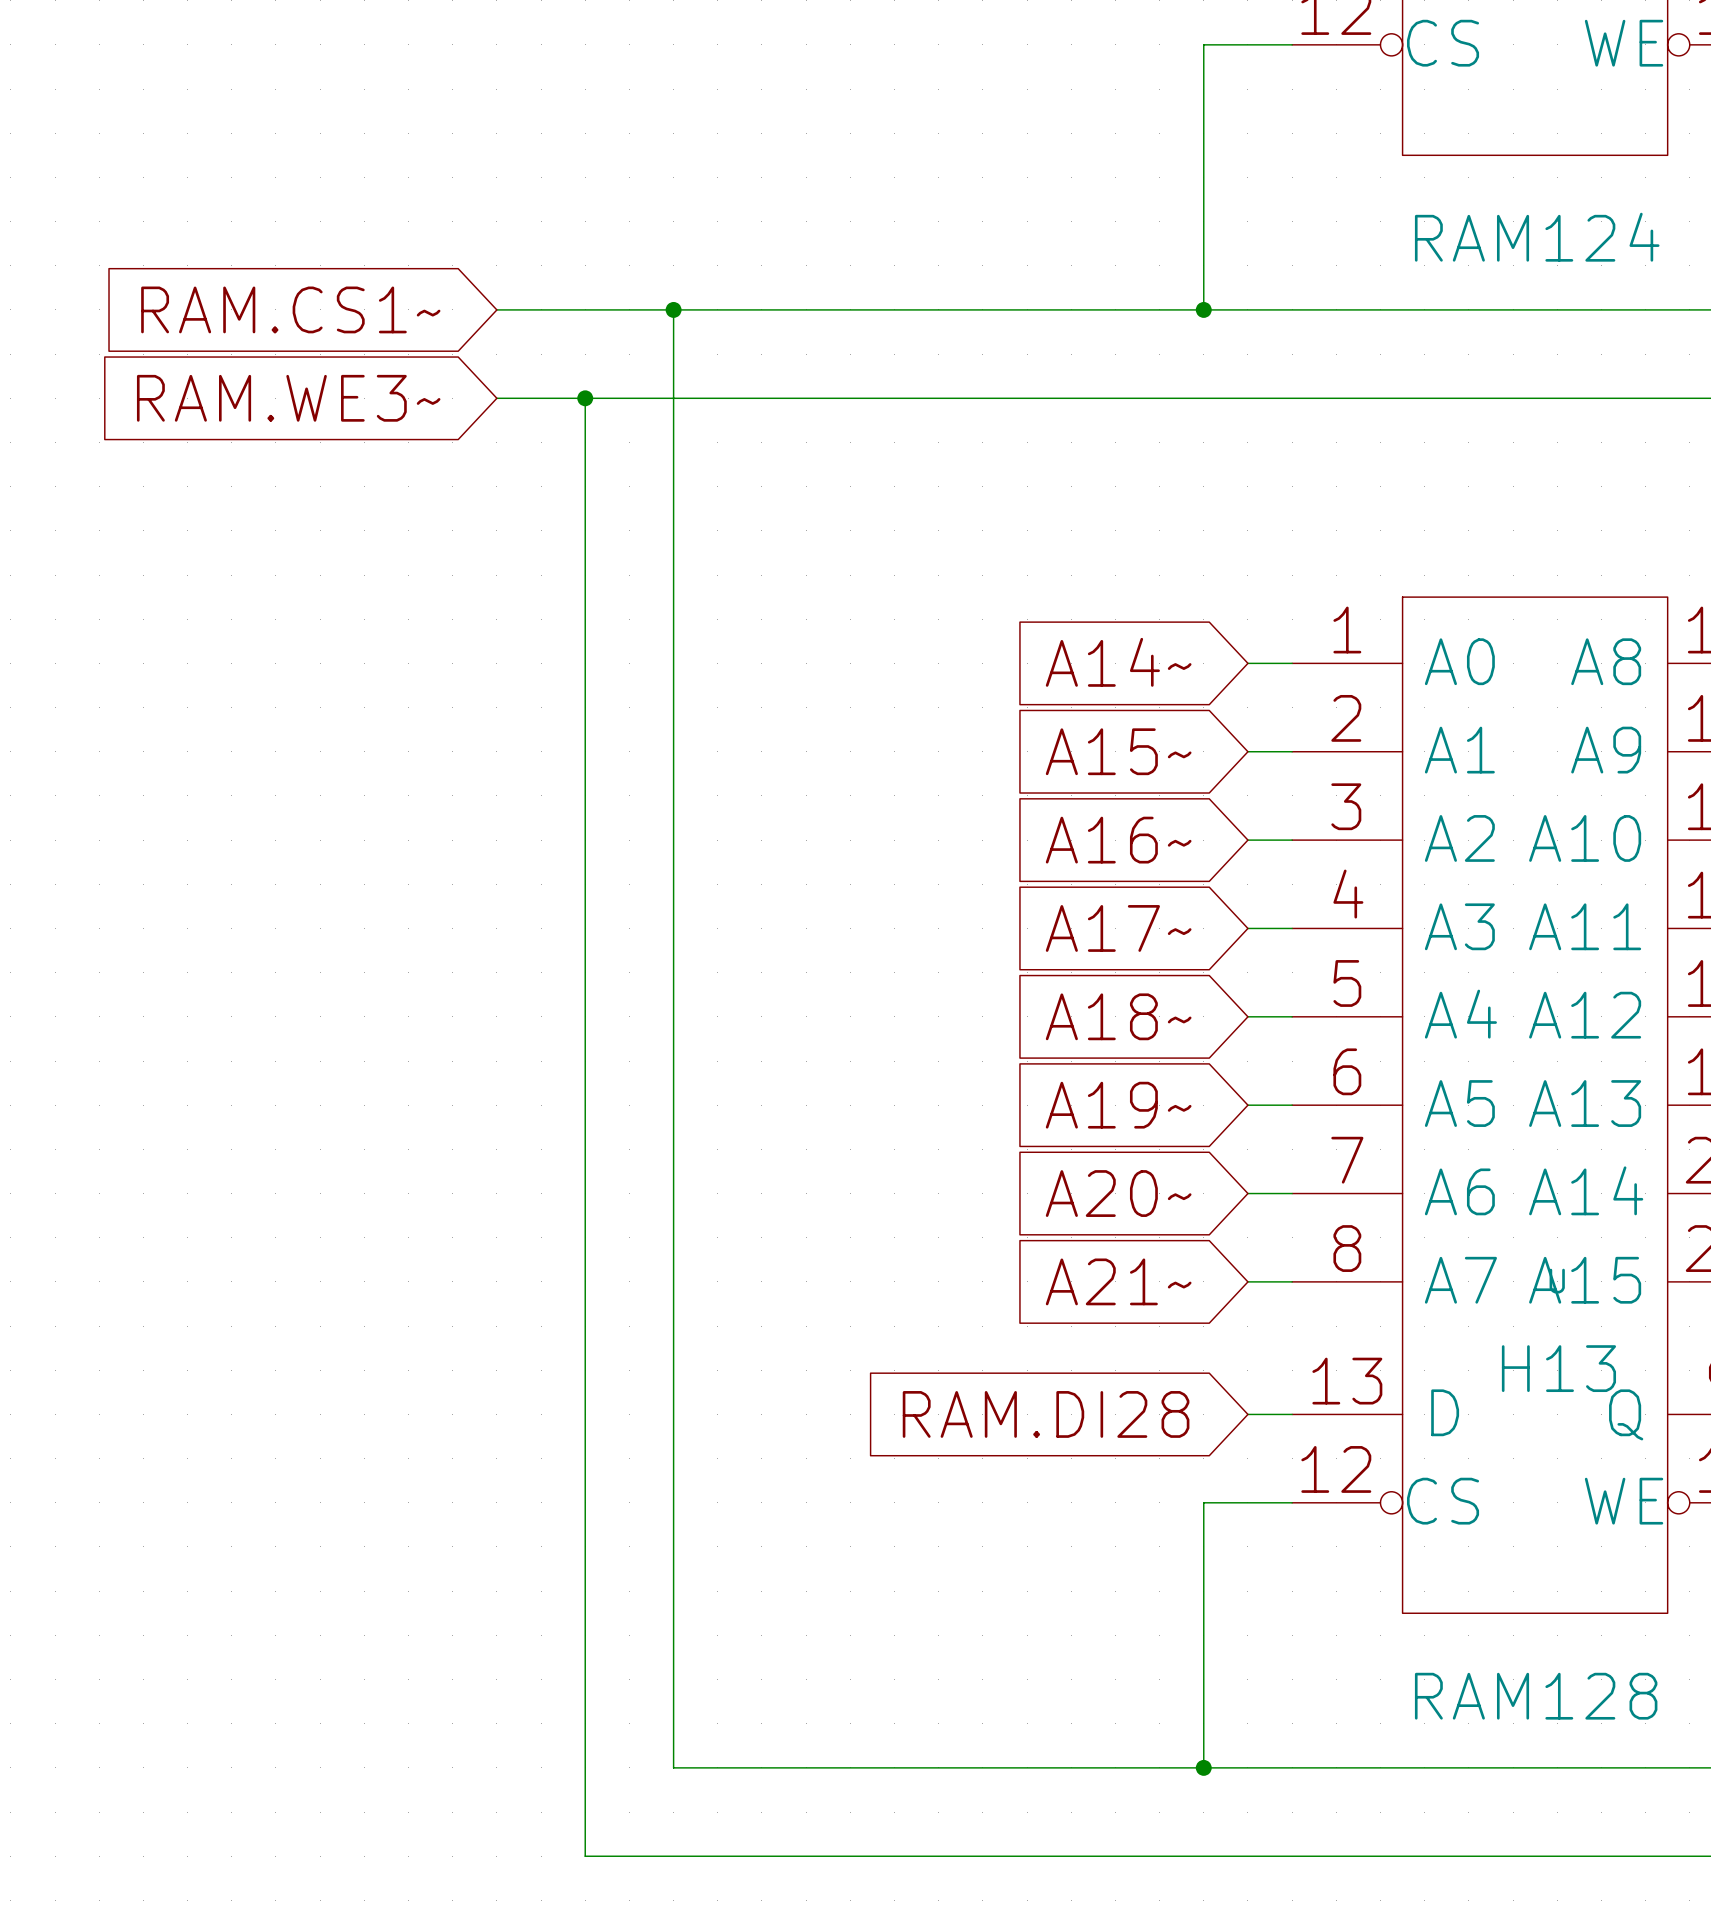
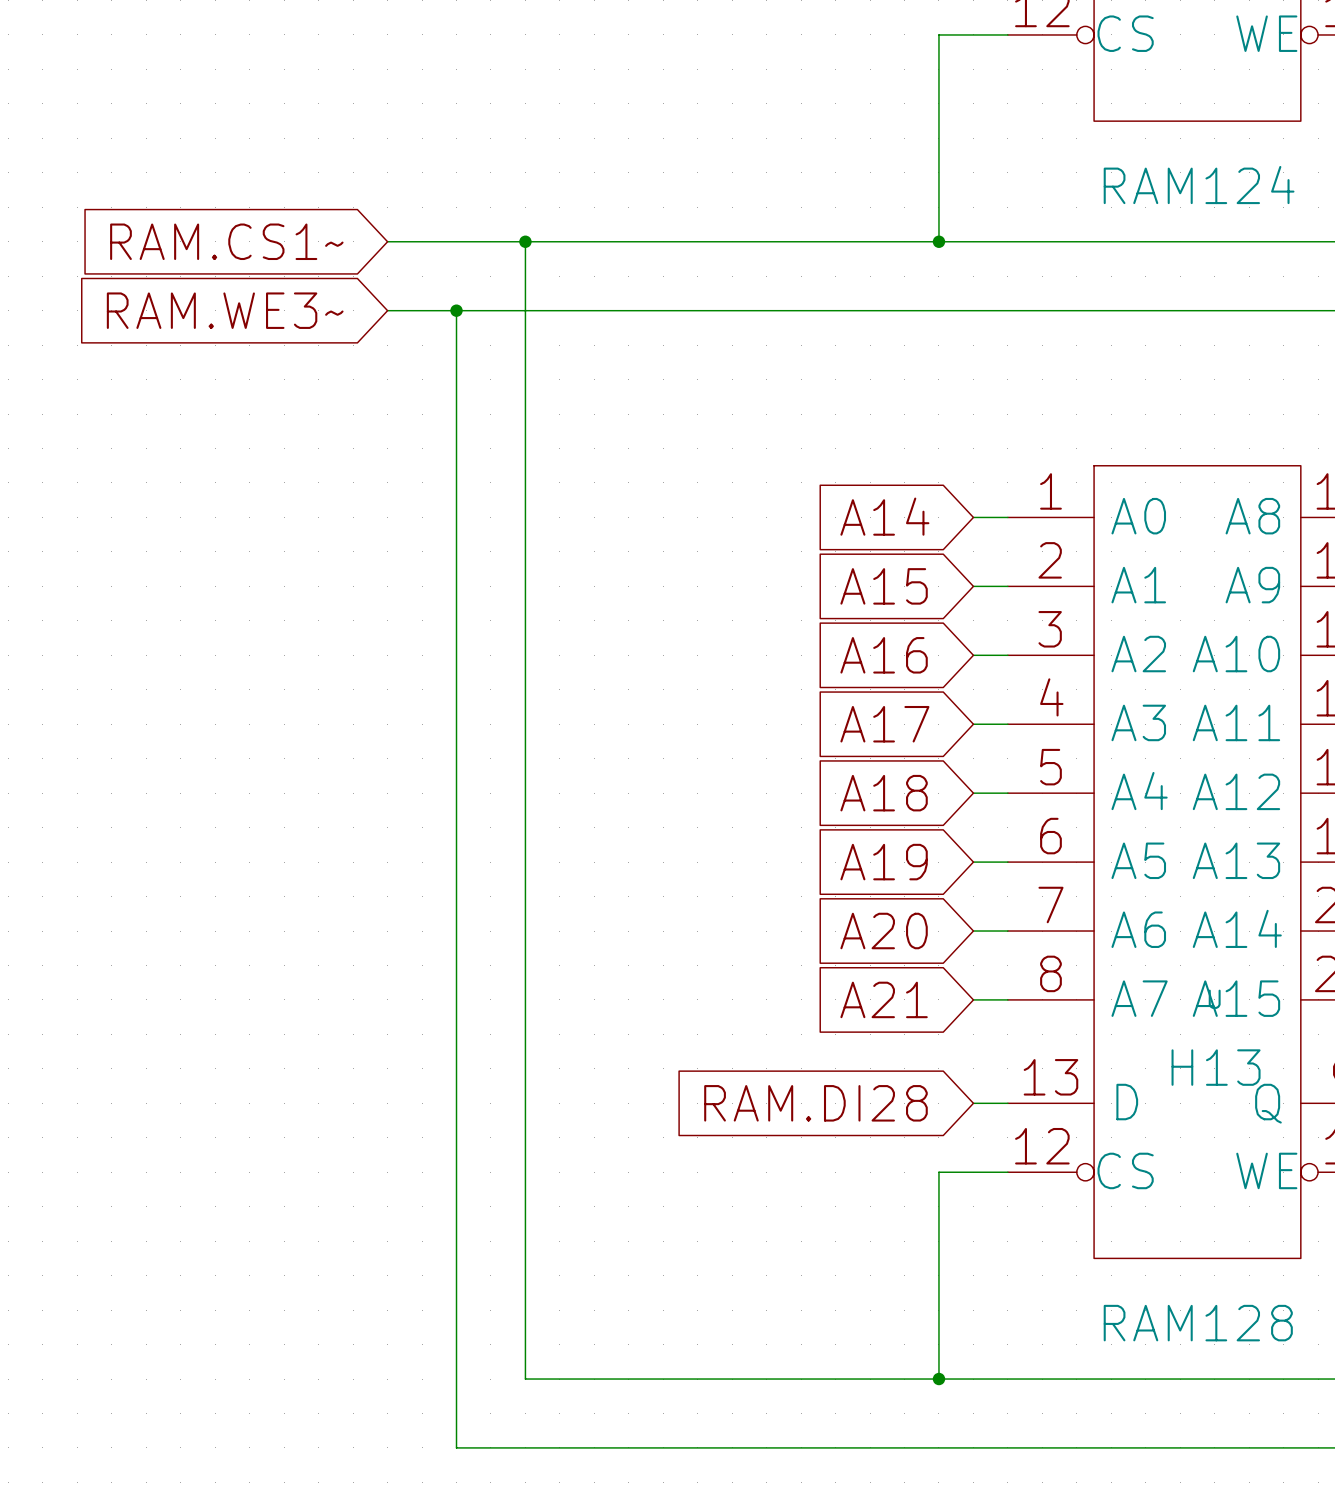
global label: A14~ (1118, 662) -> A14 (884, 516)
global label: A15~ (1118, 751) -> A15 (884, 586)
global label: A16~ (1118, 840) -> A16 (884, 655)
global label: A17~ (1118, 928) -> A17 (884, 724)
global label: A18~ (1118, 1016) -> A18 (884, 793)
global label: A19~ (1118, 1105) -> A19 (884, 862)
global label: A20~ (1118, 1193) -> A20 (884, 931)
global label: A21~ (1118, 1281) -> A21 (884, 999)

